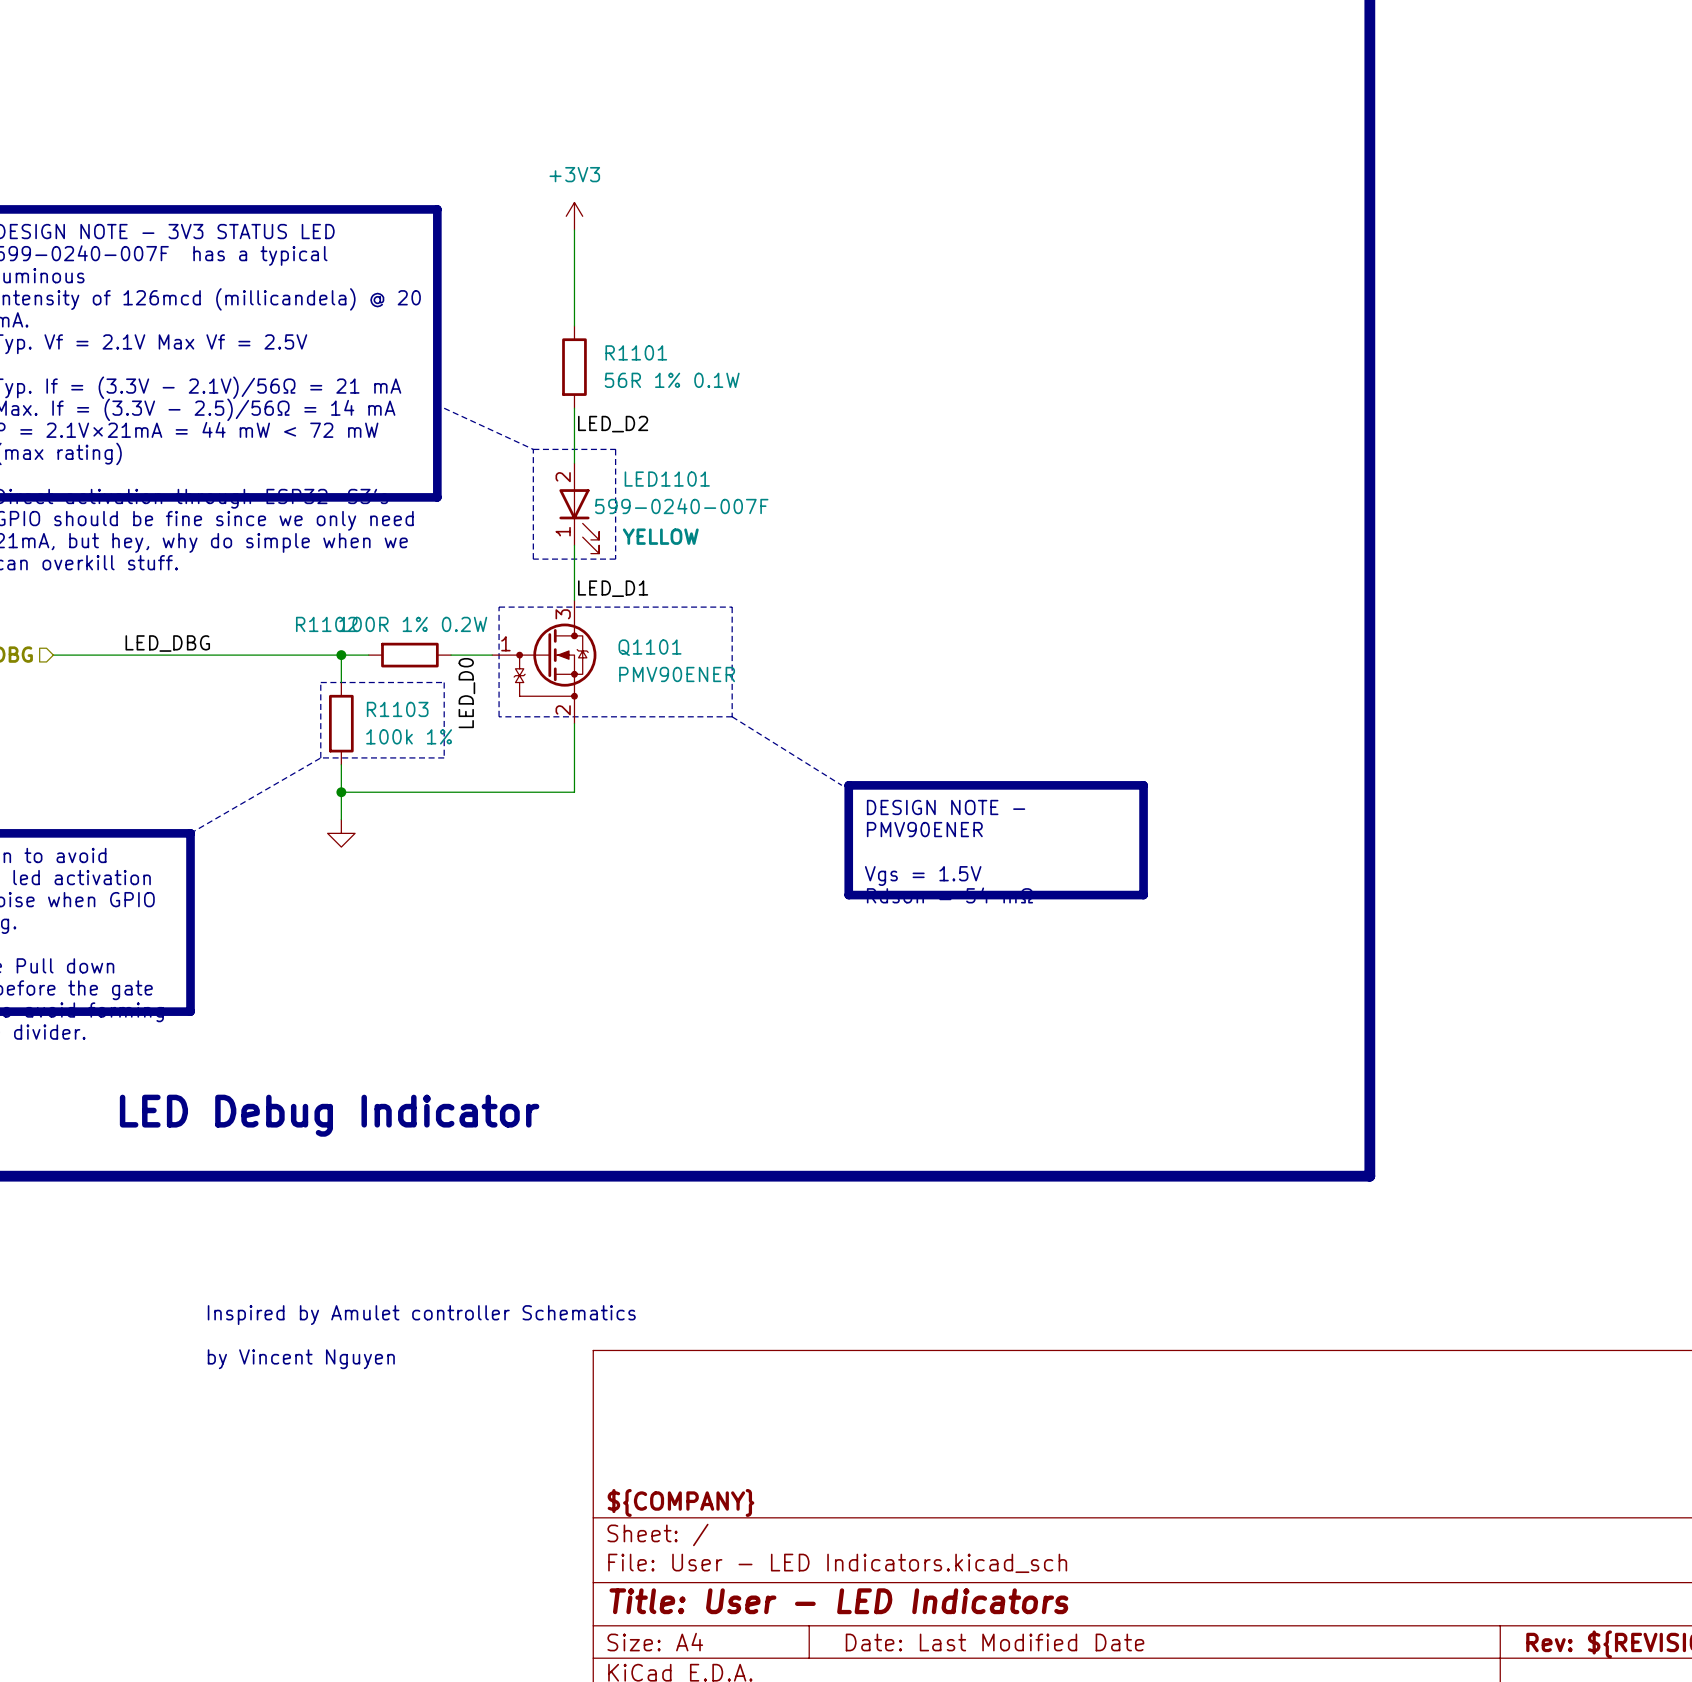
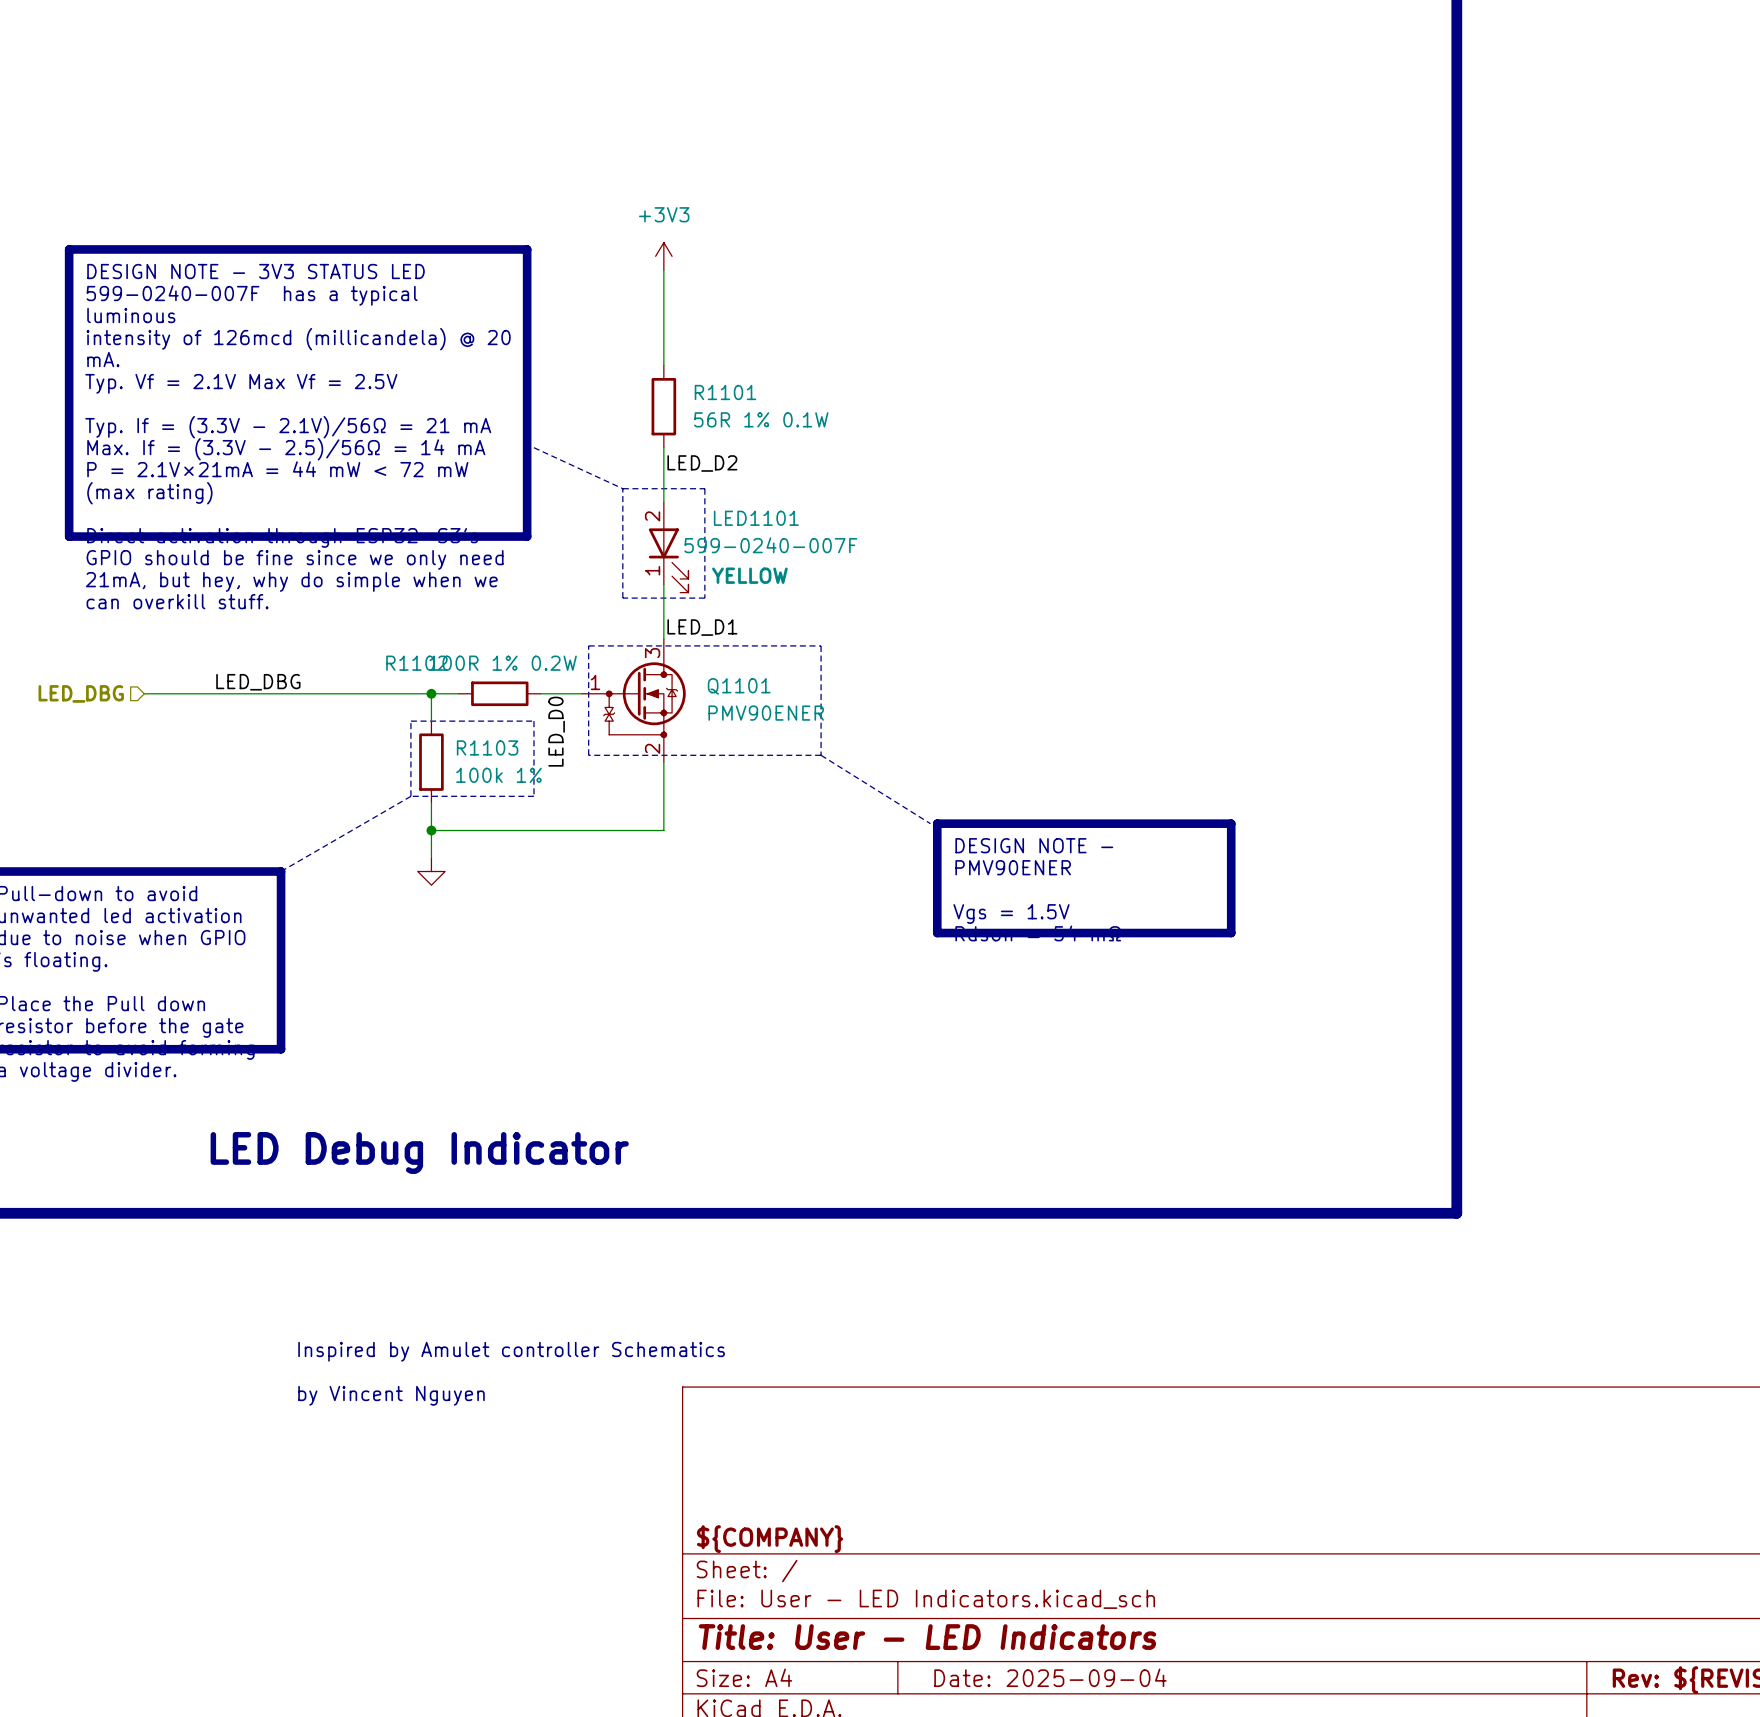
title block: Date: Last Modified Date (995, 1642) -> Date: 2025-09-04 (1050, 1677)

